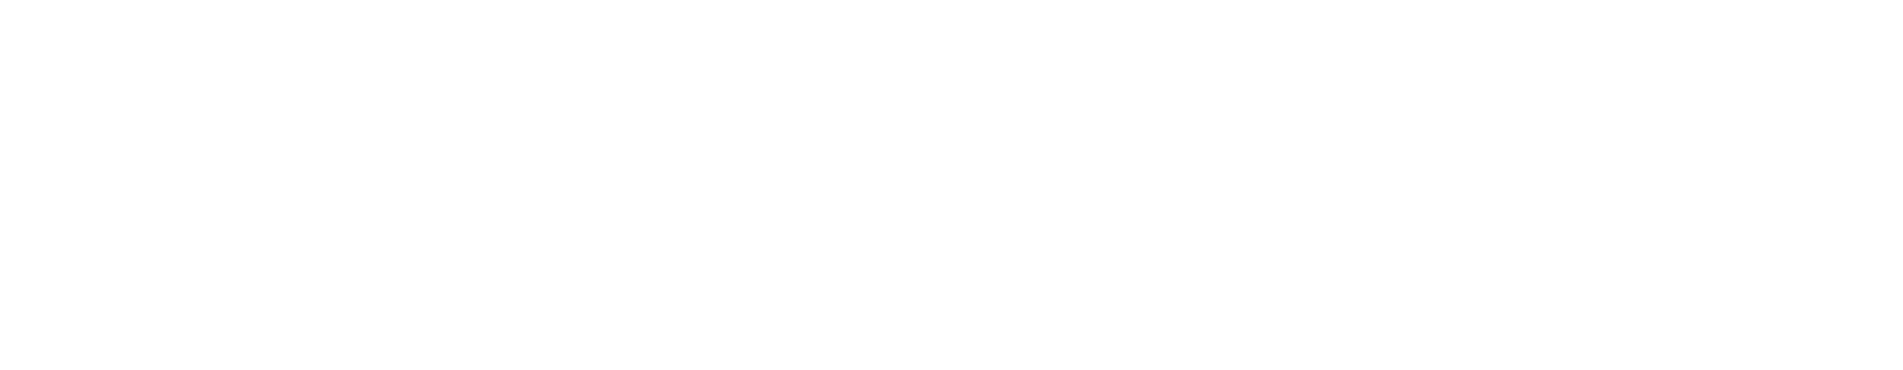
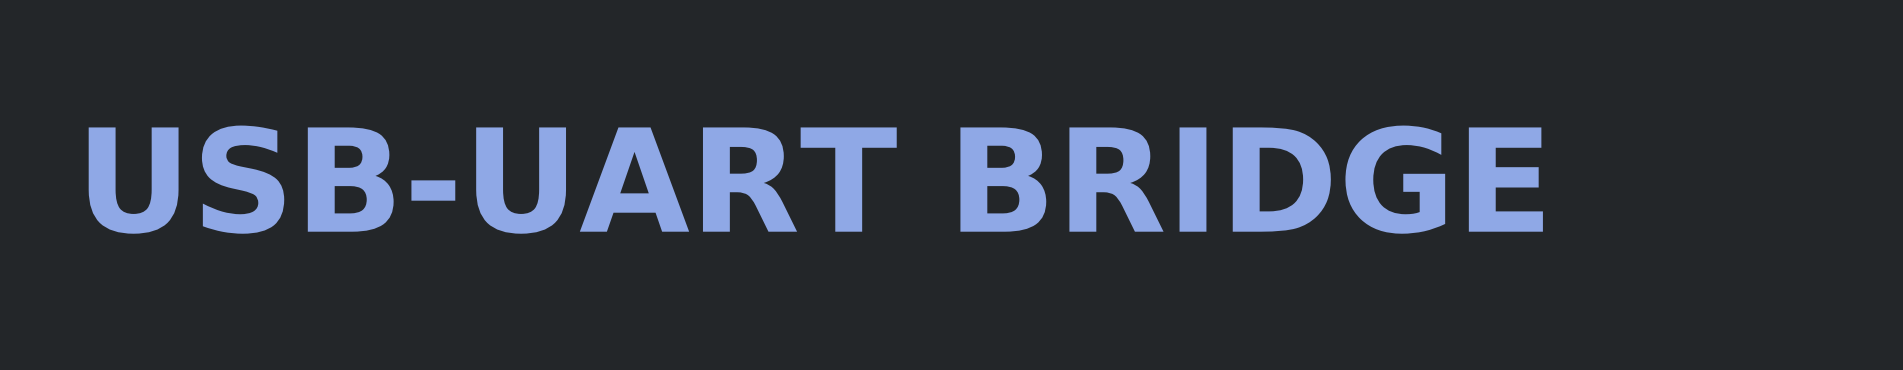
text: none -> USB-UART BRIDGE (815, 179)

